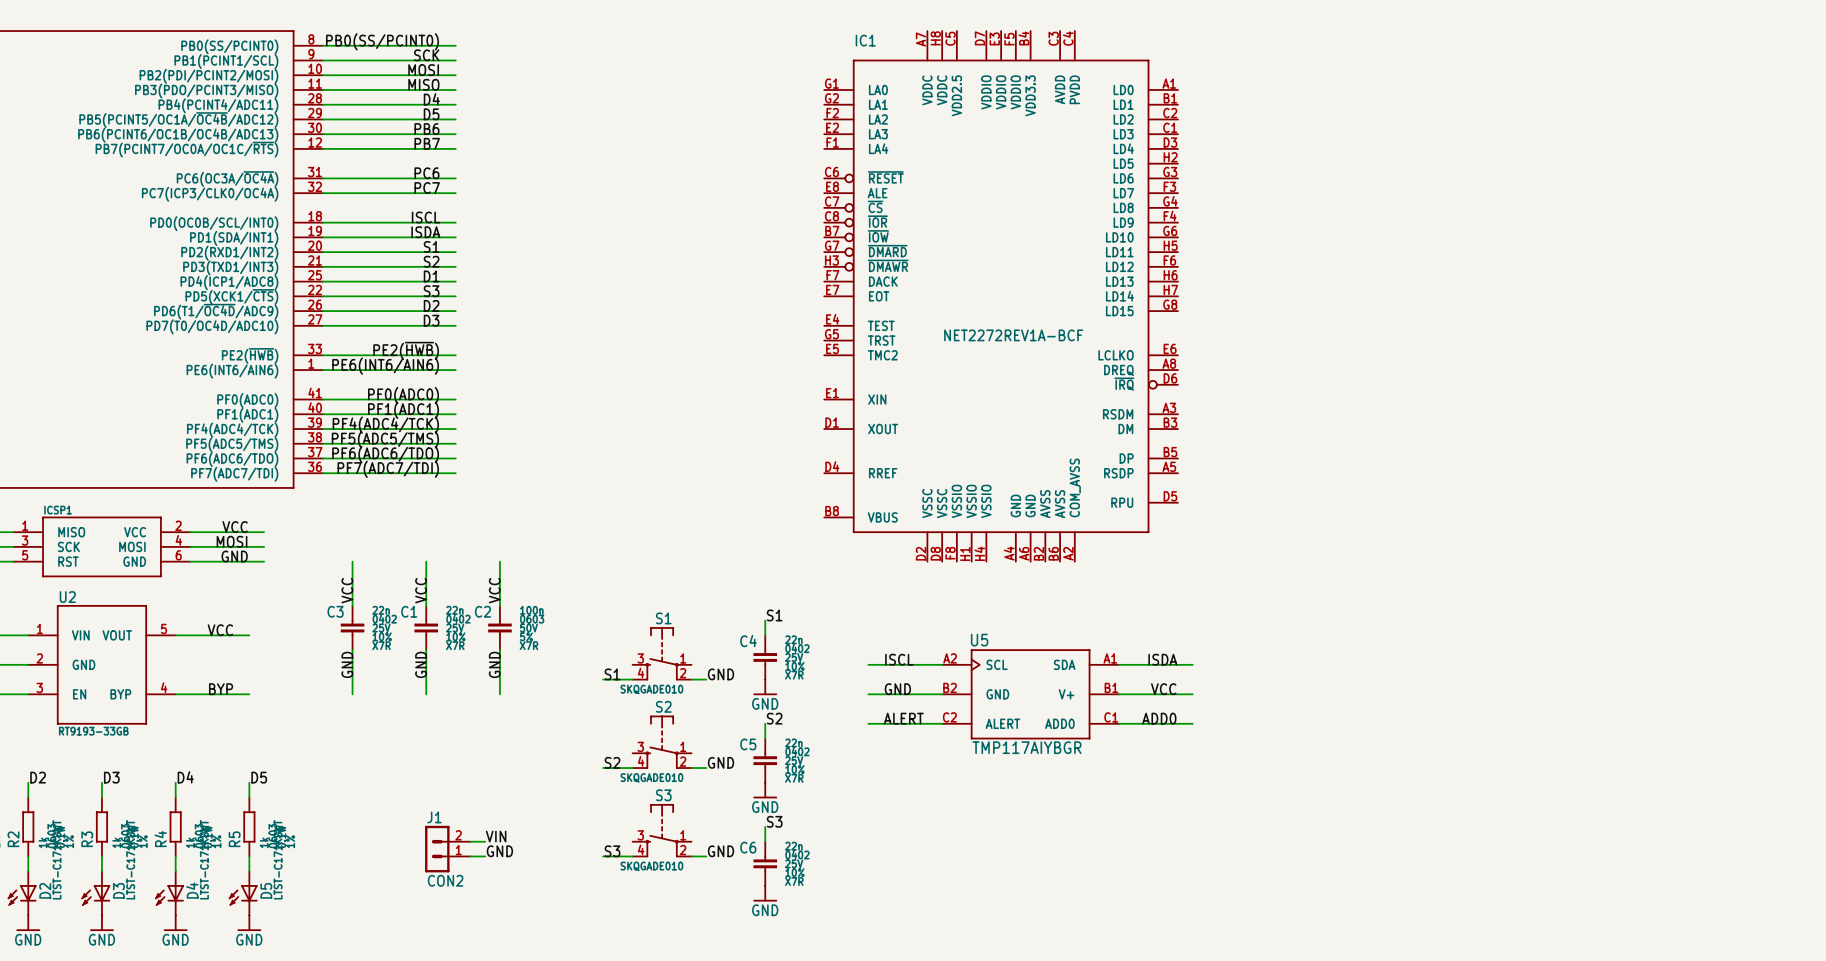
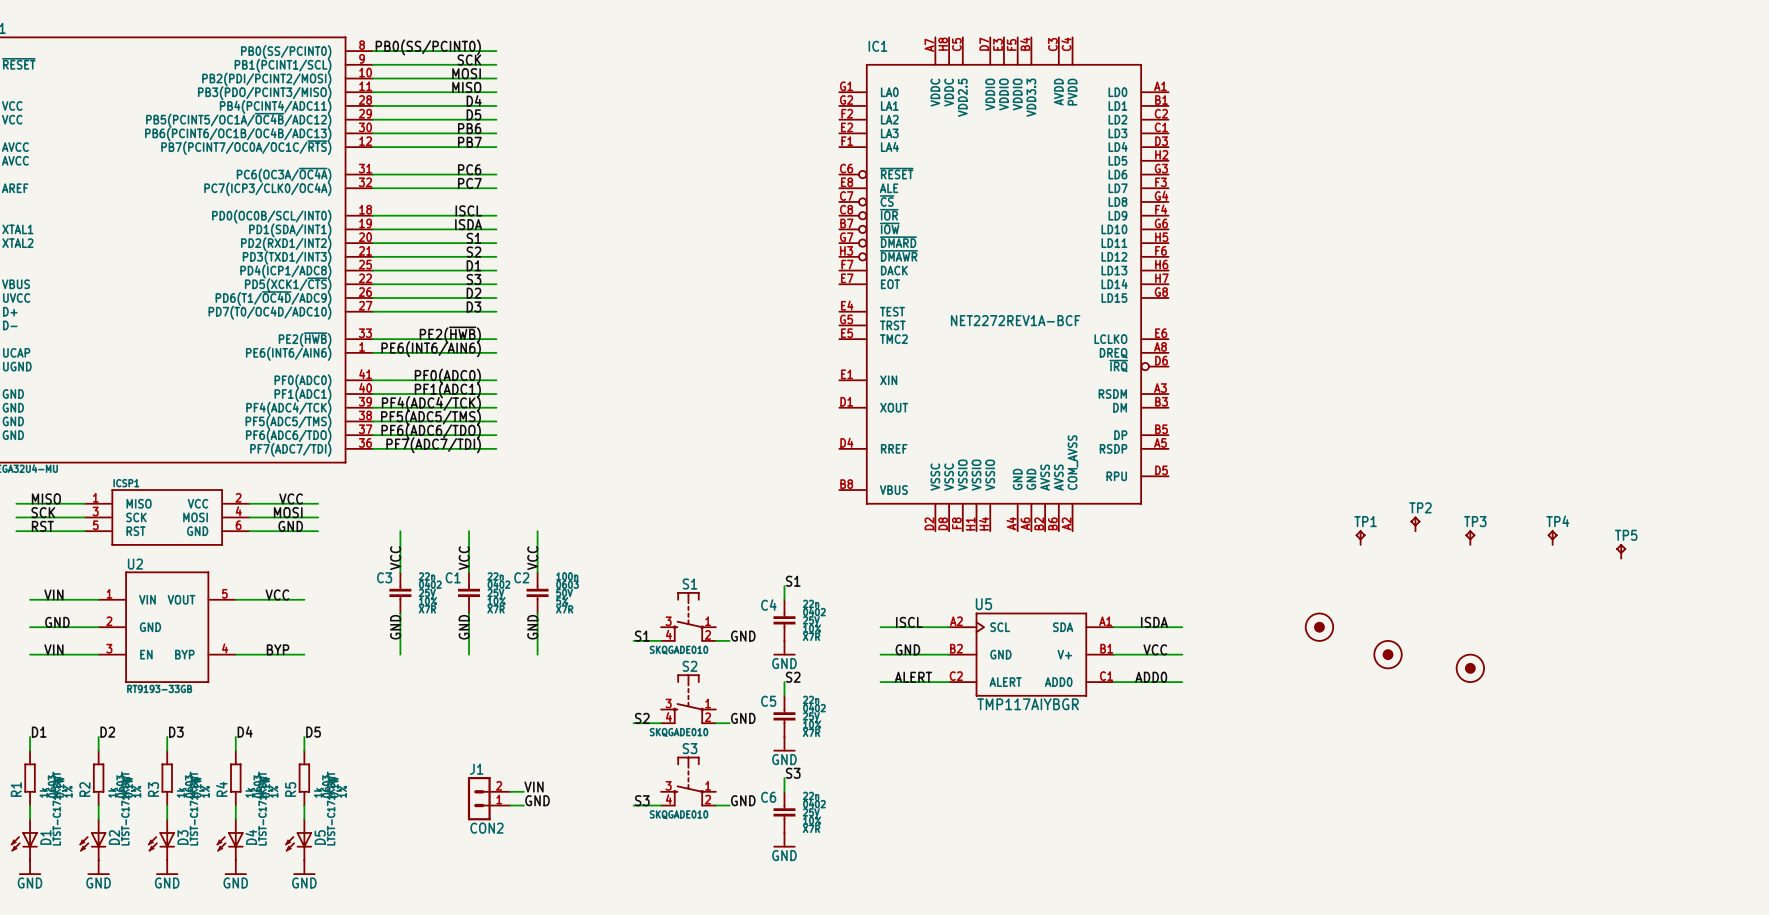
TP2: none -> (1415, 523)
TP1: none -> (1360, 537)
TP3: none -> (1470, 537)
TP4: none -> (1552, 537)
TP5: none -> (1621, 551)
part: none -> (1319, 627)
part: none -> (1388, 654)
part: none -> (1470, 668)

